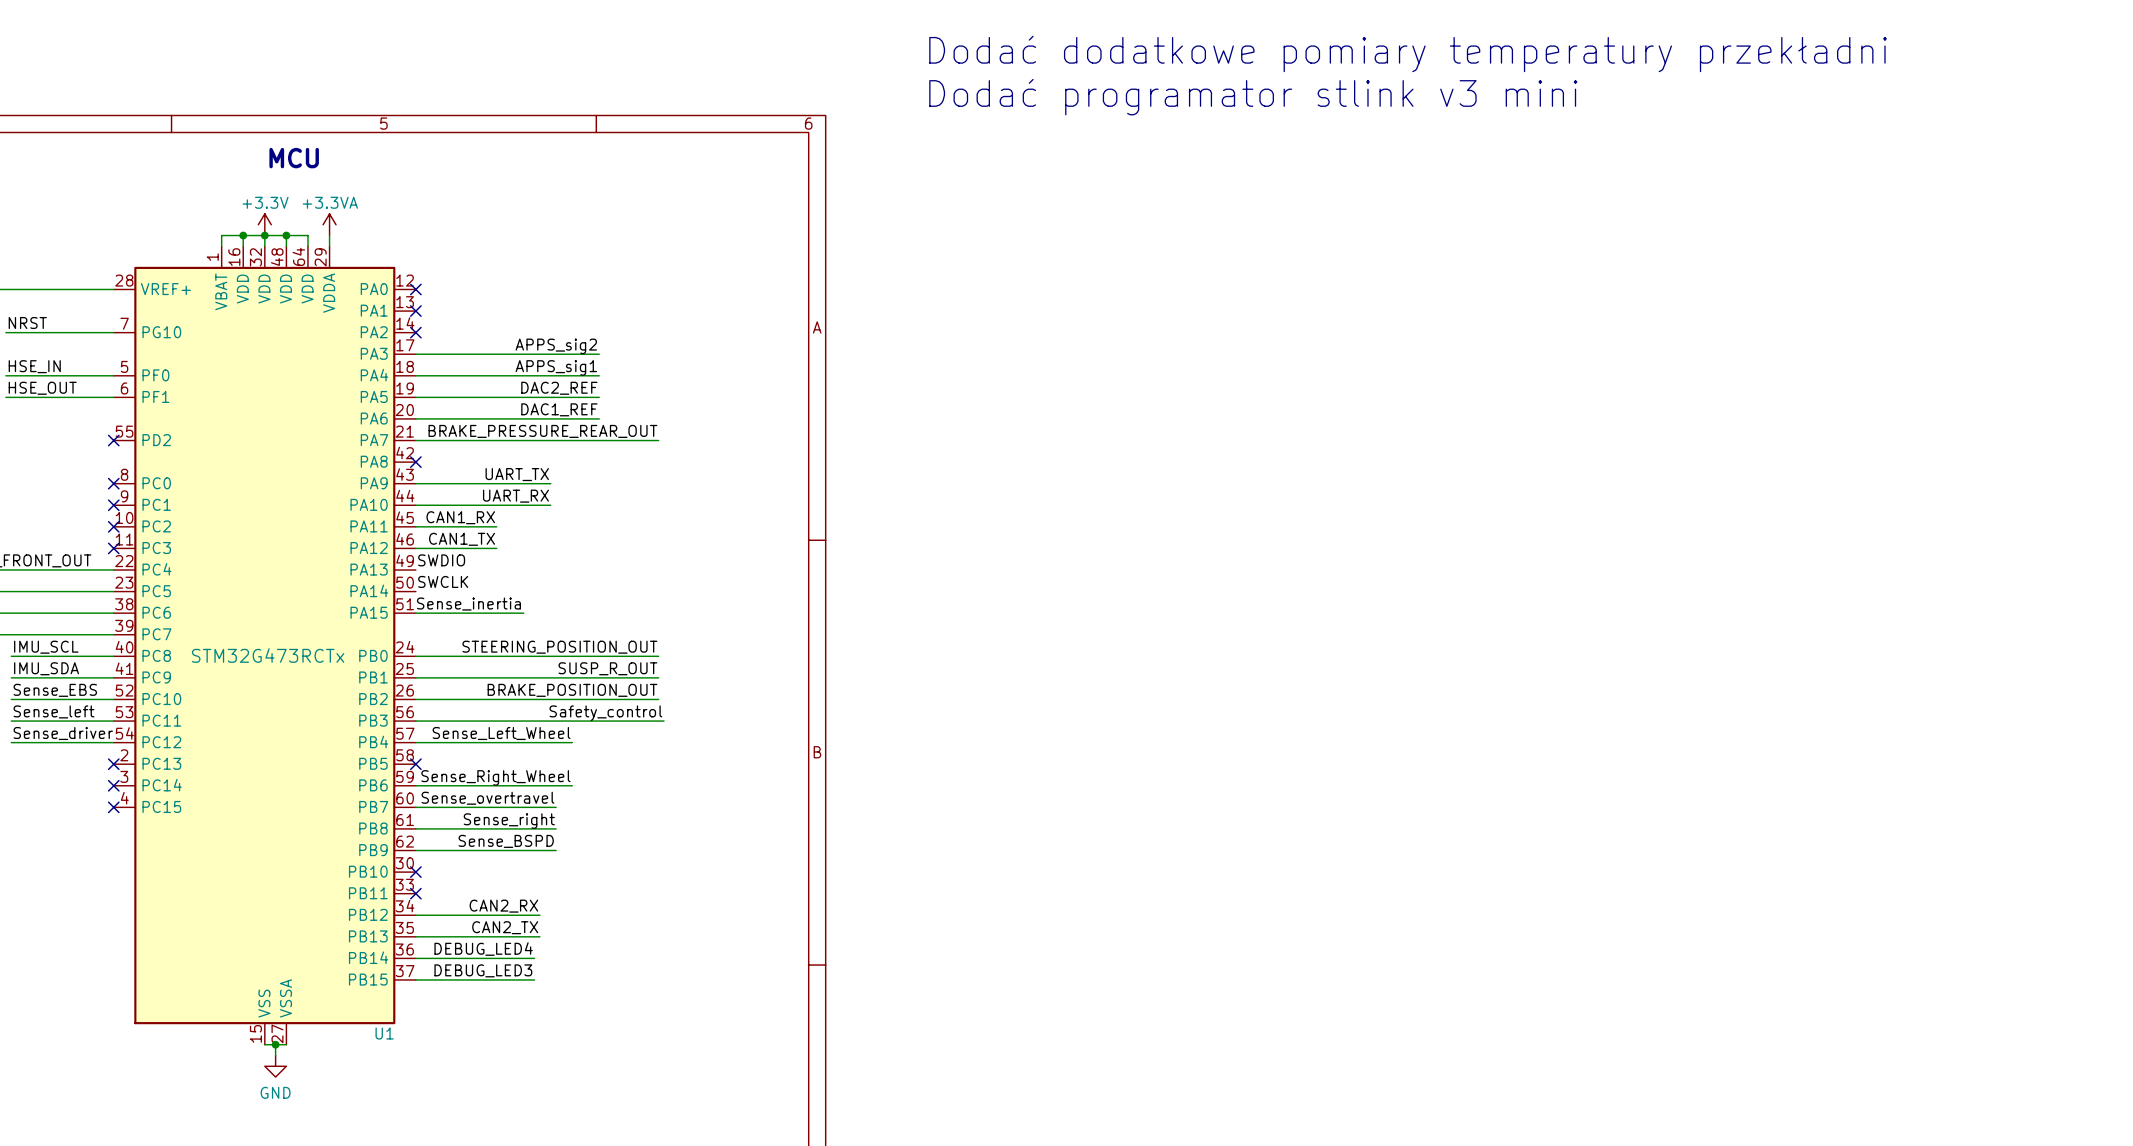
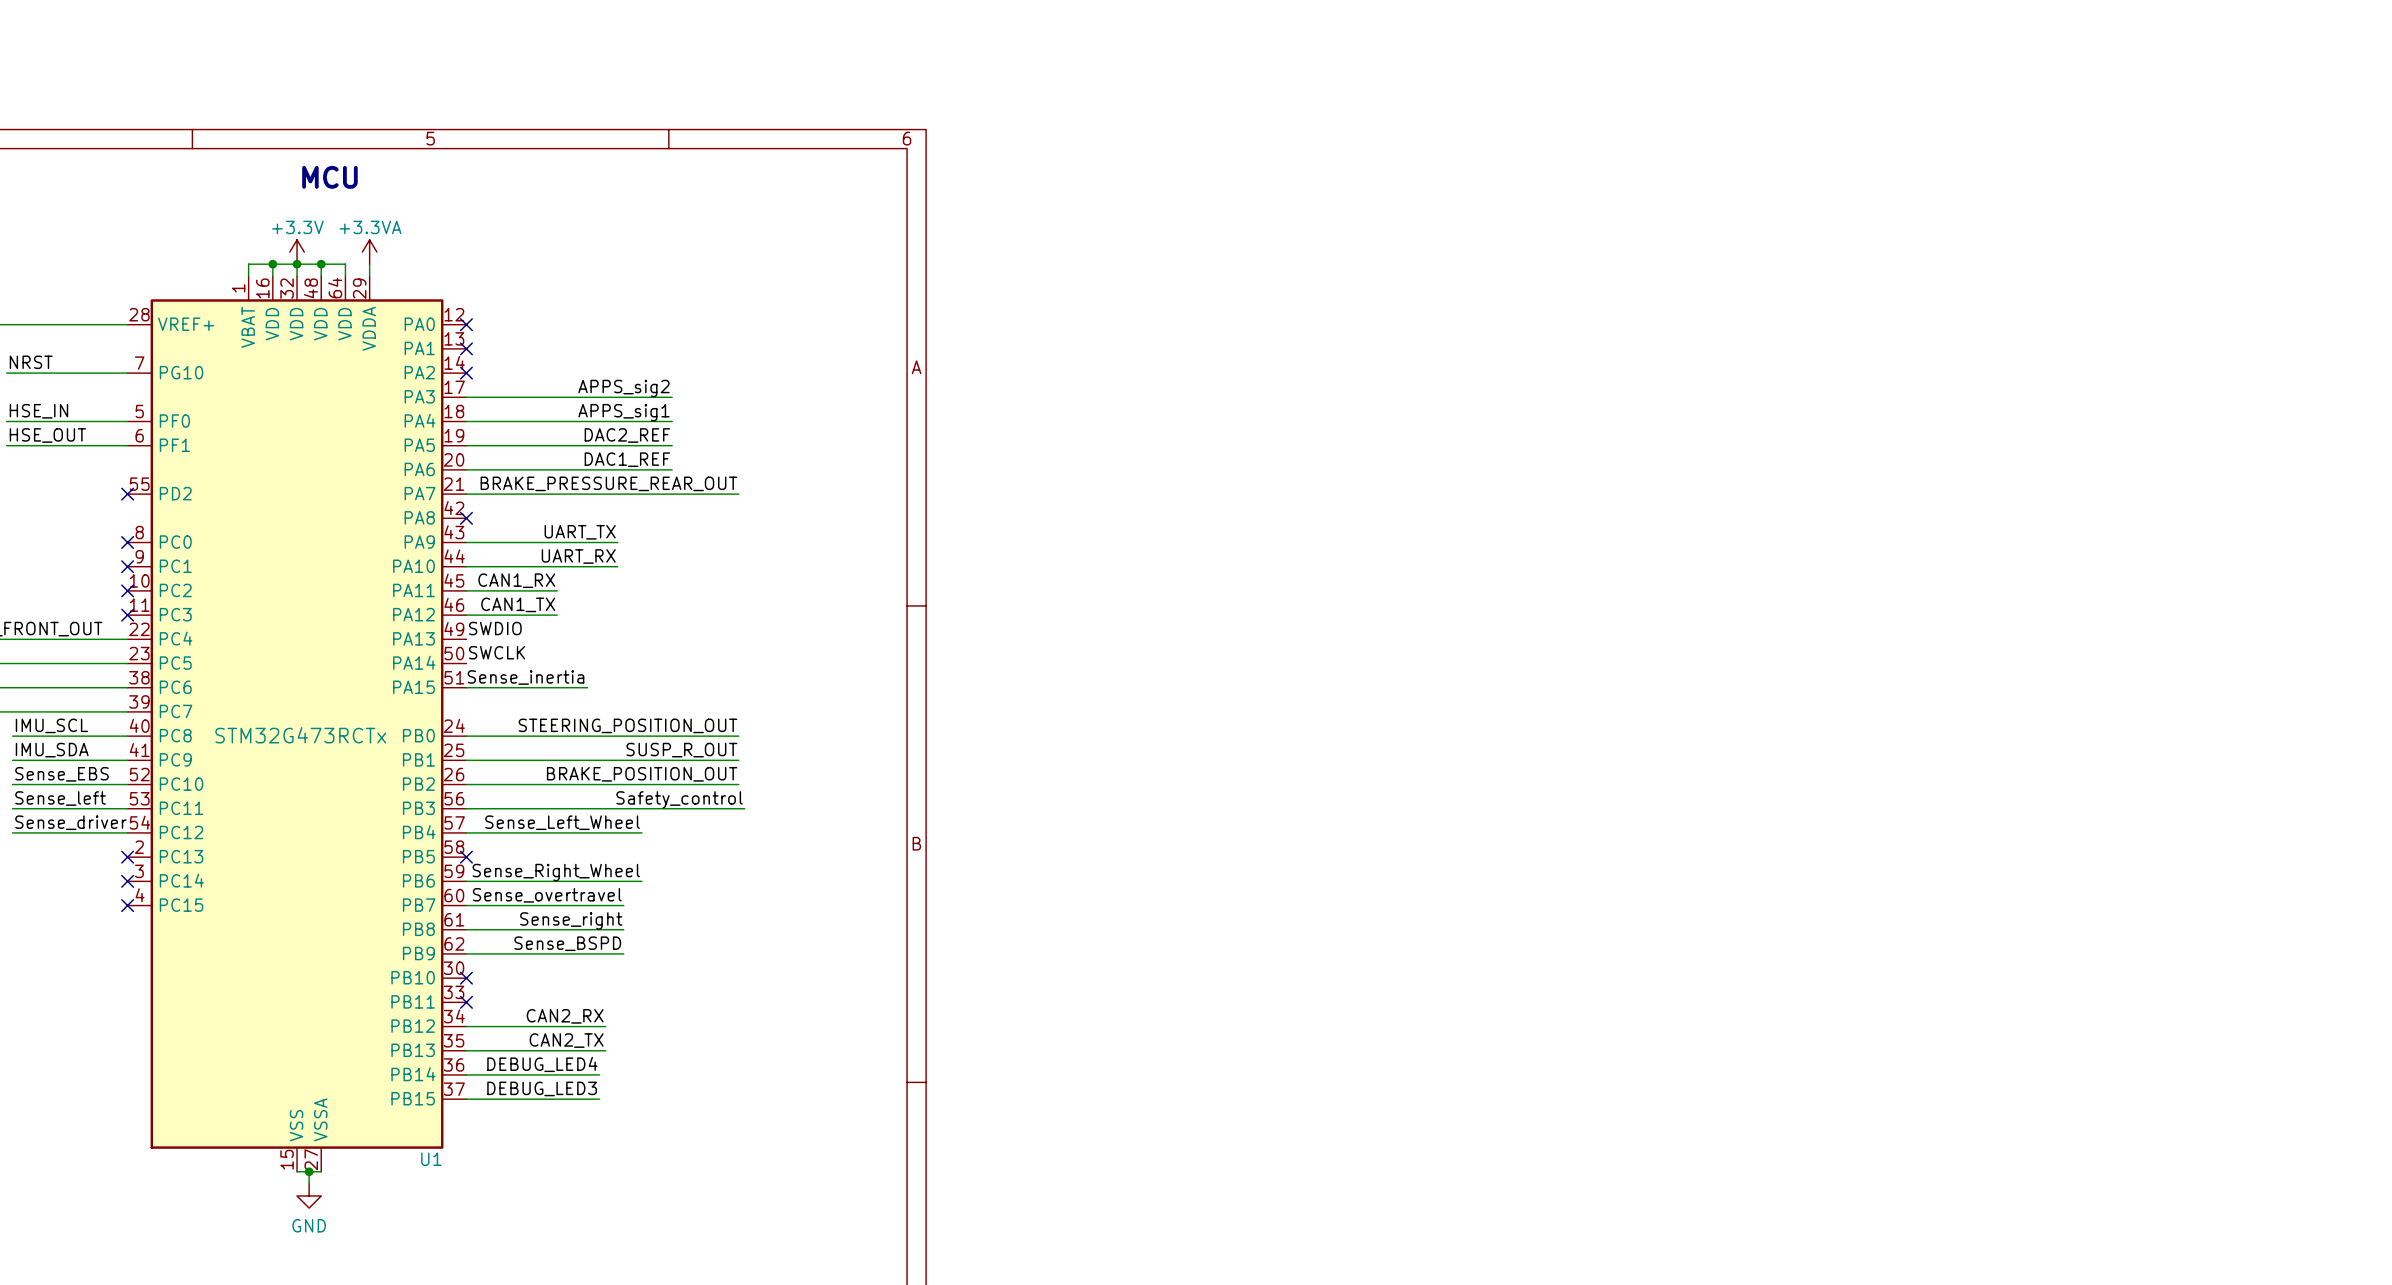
text: Dodać dodatkowe pomiary temperatury przekładni (1408, 53) -> none
text: Dodać programator stlink v3 mini (1253, 97) -> none

